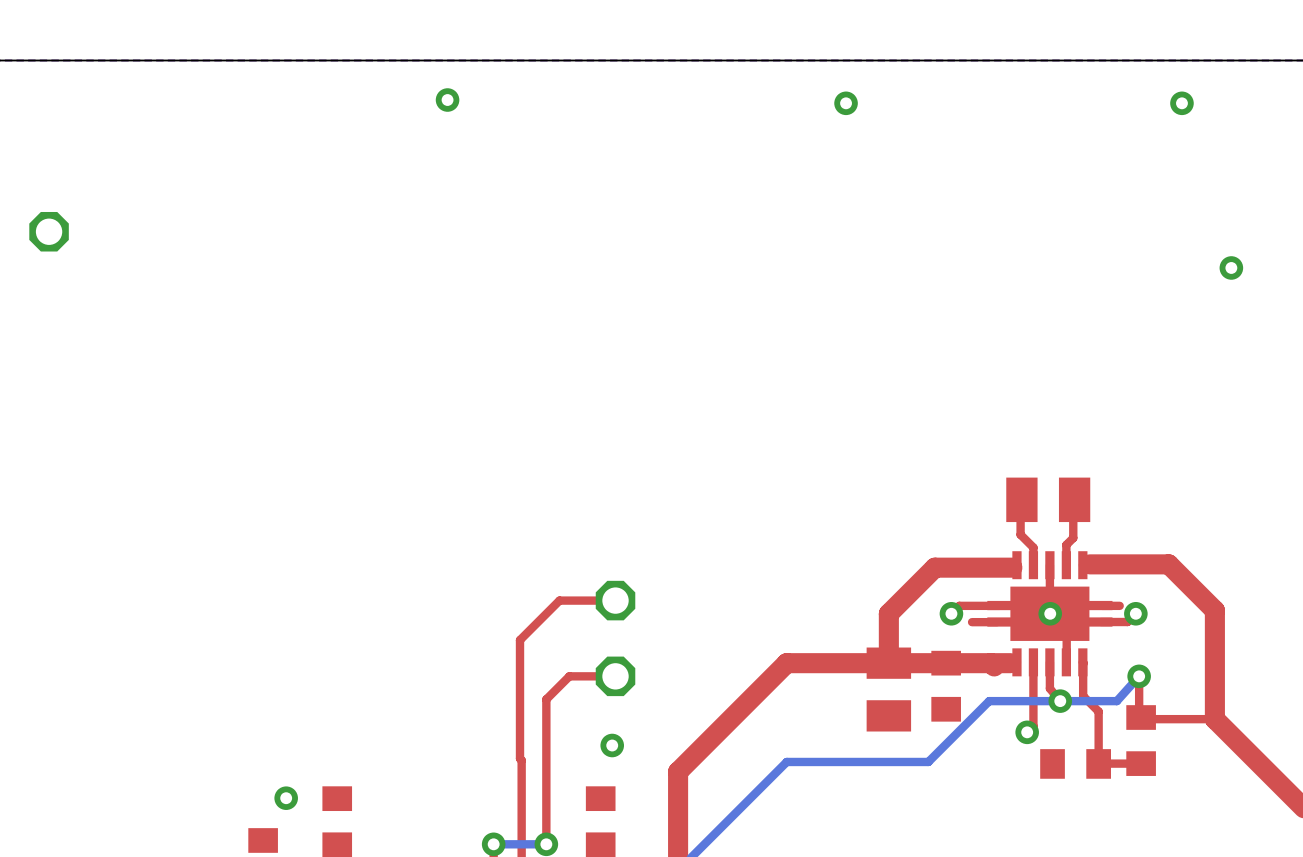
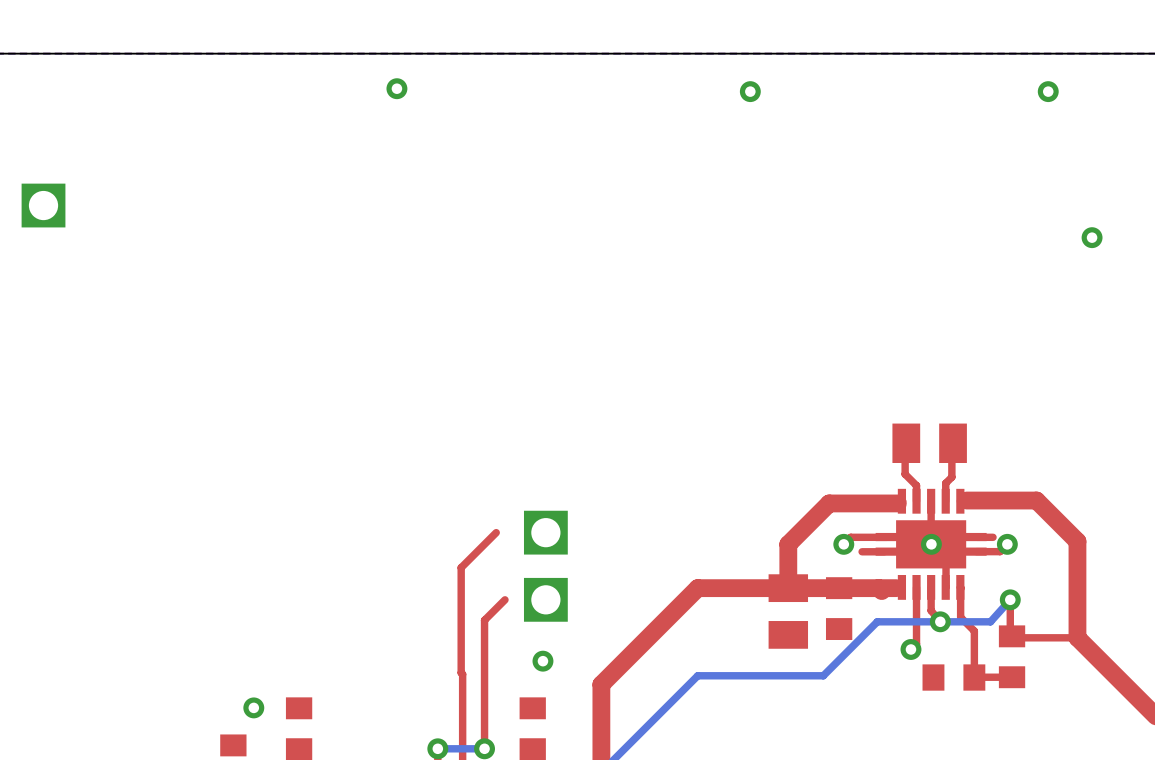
part footprint: [29, 211, 69, 252] -> [21, 183, 66, 228]
part footprint: [595, 580, 636, 621] -> [523, 510, 568, 555]
top track: (615, 600) (559, 600) -> none
part footprint: [595, 656, 636, 697] -> [523, 577, 568, 622]
top track: (615, 676) (569, 676) -> none

